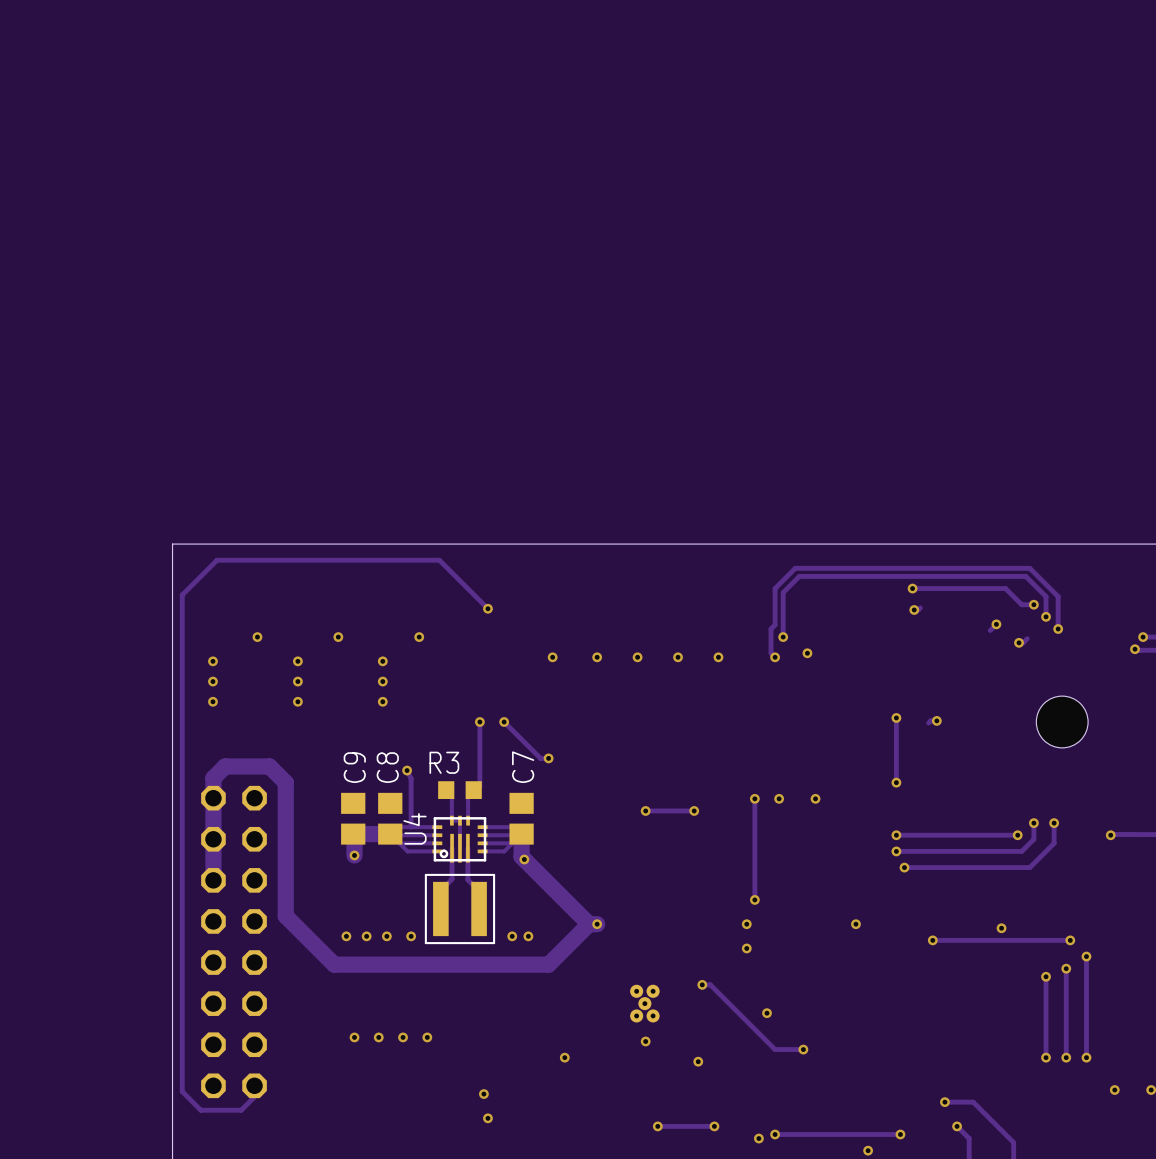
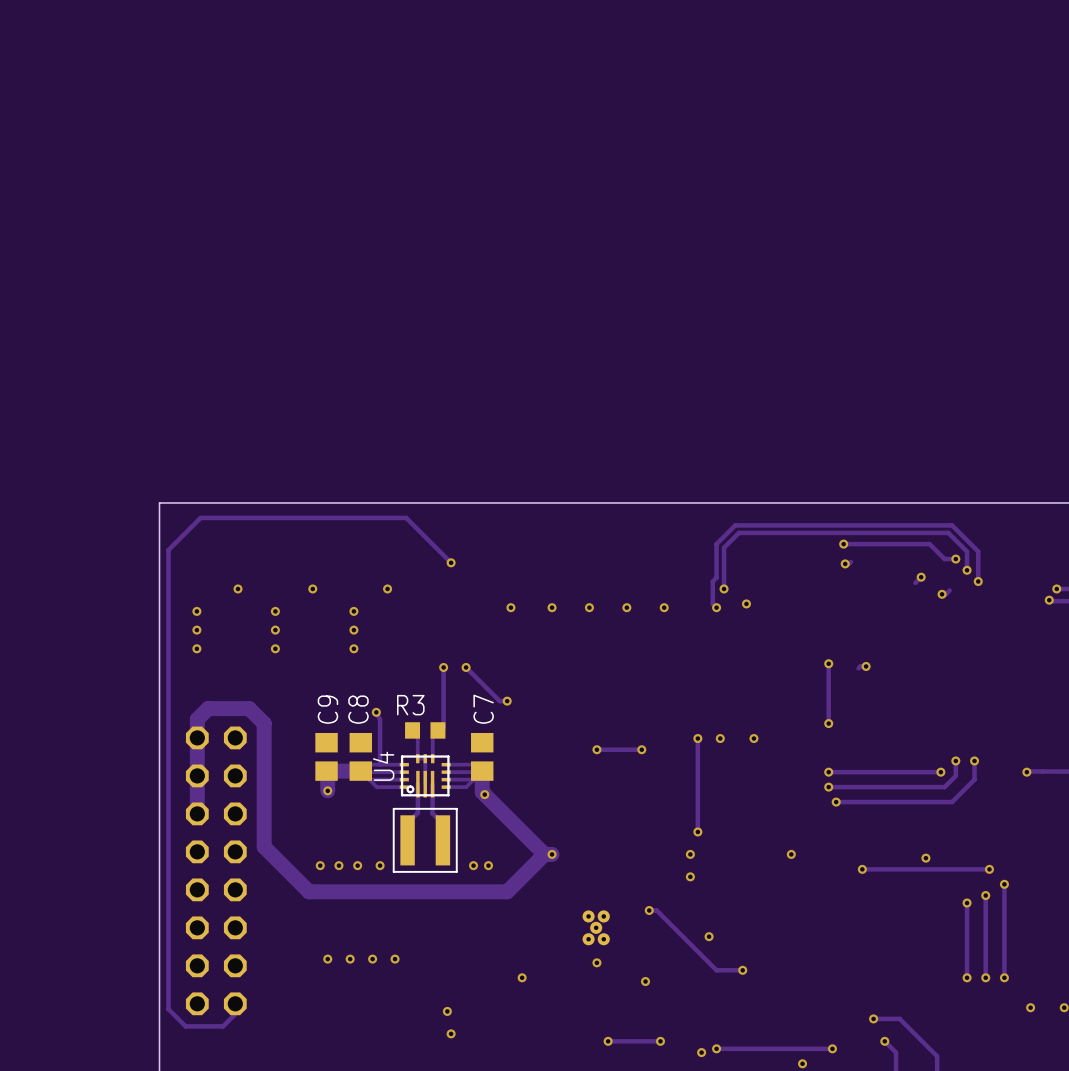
hole: (1062, 722) -> none

